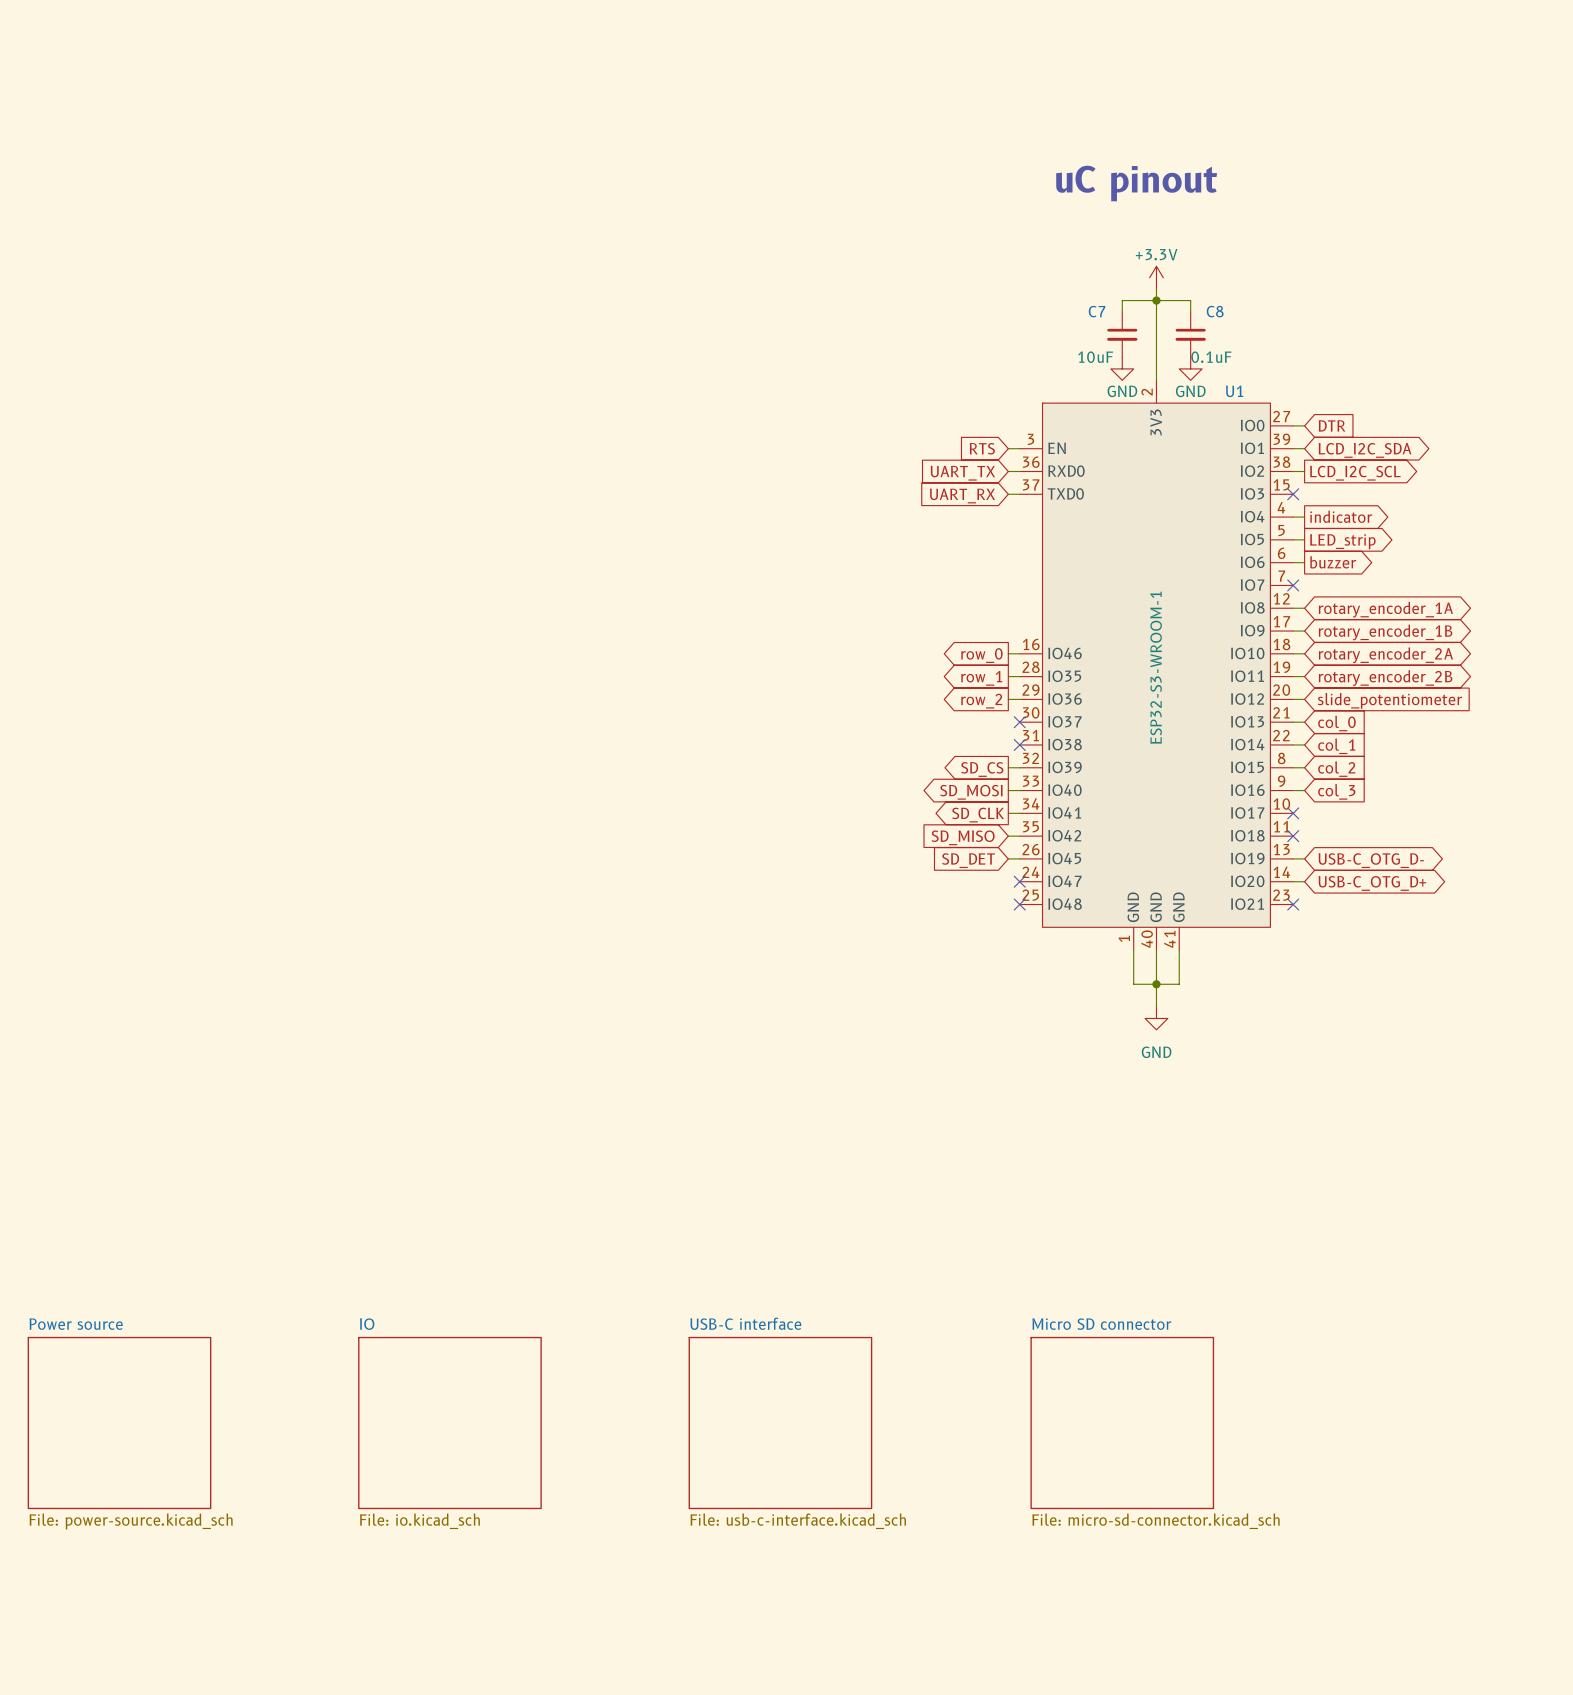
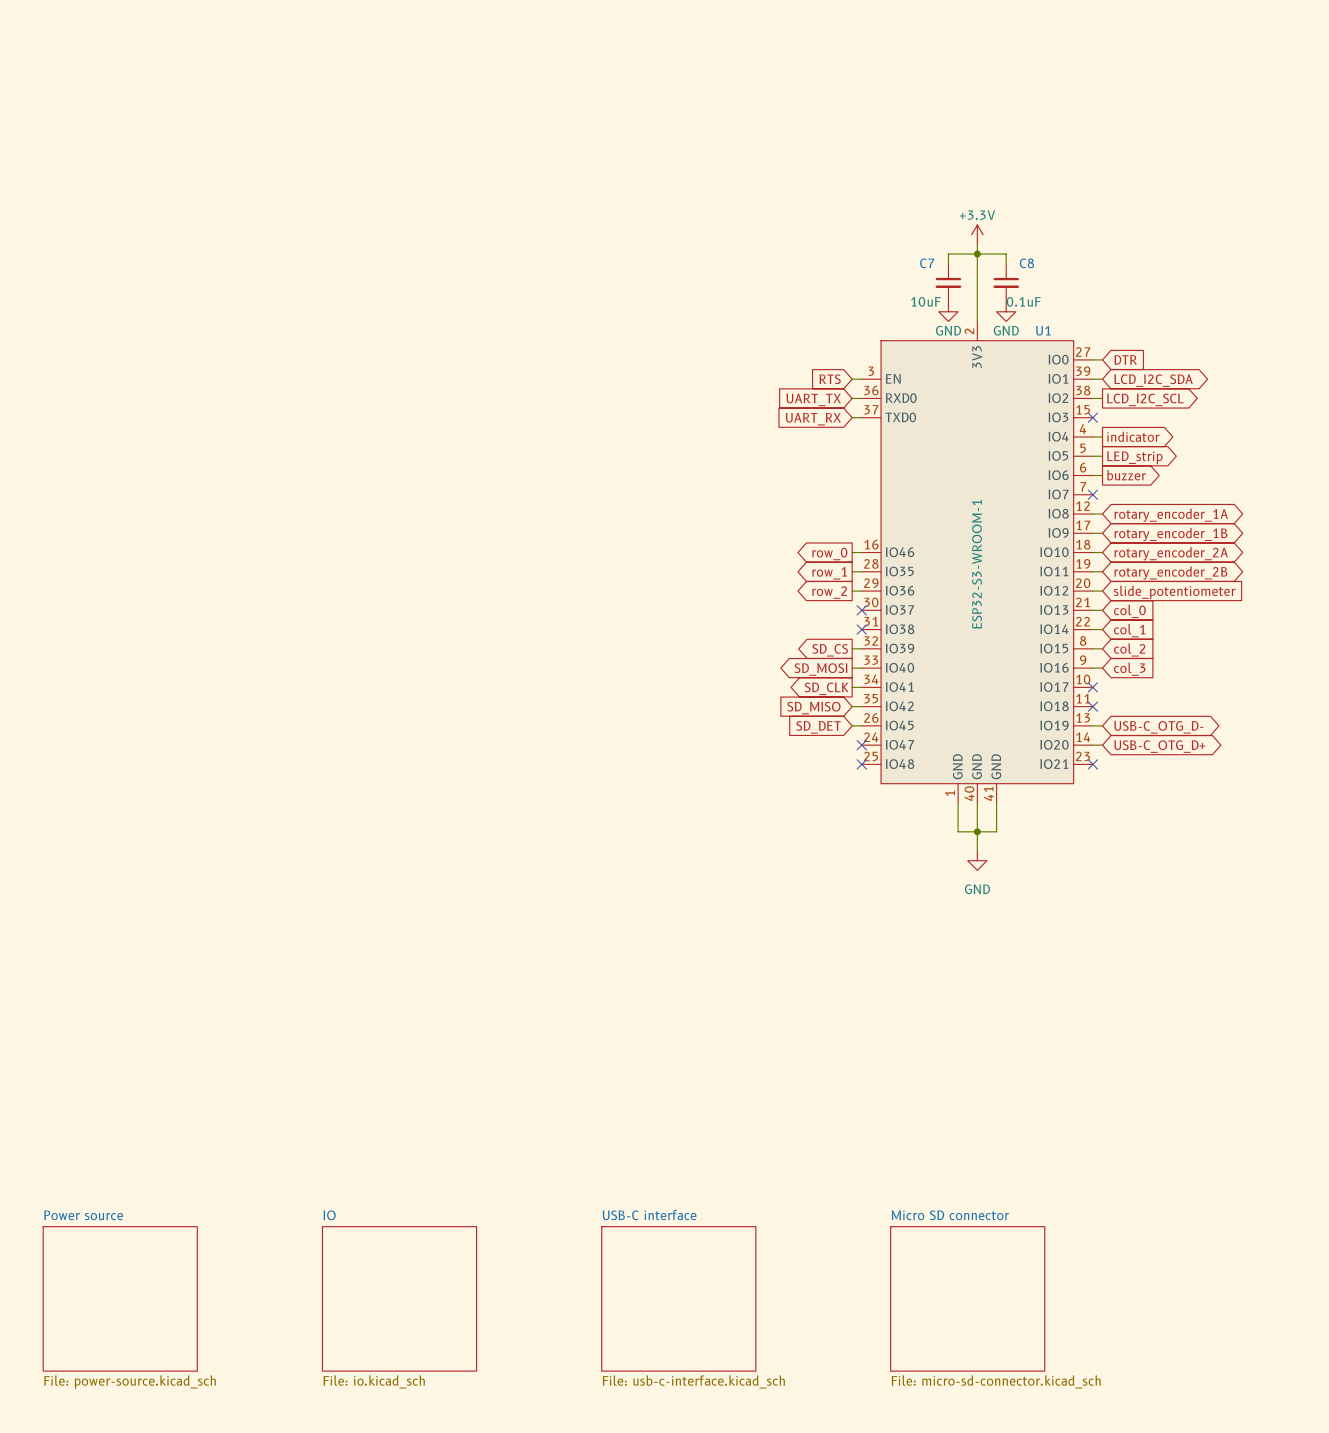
text: uC pinout (1136, 183) -> none
sheet Power source position: (119, 1423) -> (120, 1298)
sheet IO position: (449, 1423) -> (399, 1298)
sheet USB-C interface position: (780, 1423) -> (678, 1298)
sheet Micro SD connector position: (1122, 1423) -> (967, 1298)

